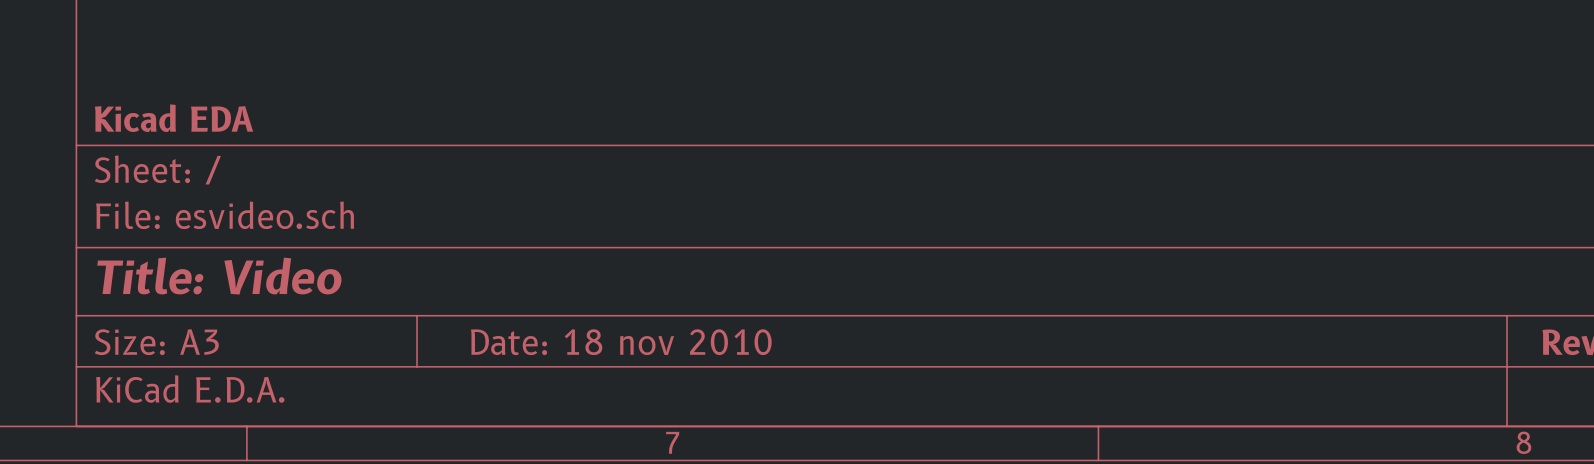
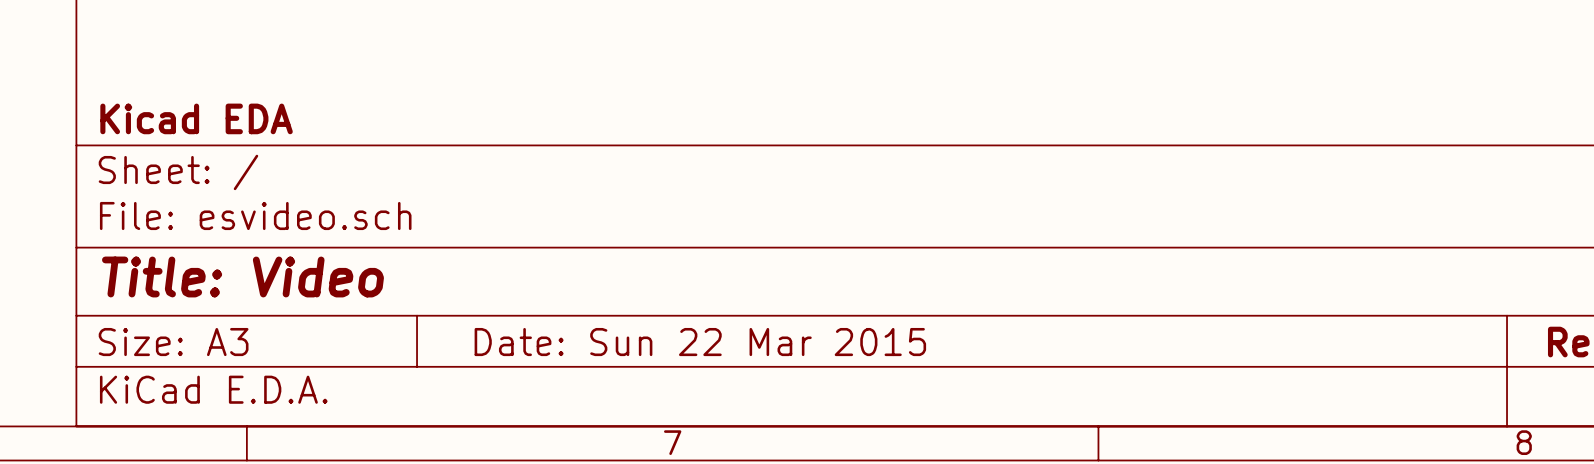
title block: Date: 18 nov 2010 (621, 342) -> Date: Sun 22 Mar 2015 (700, 342)

